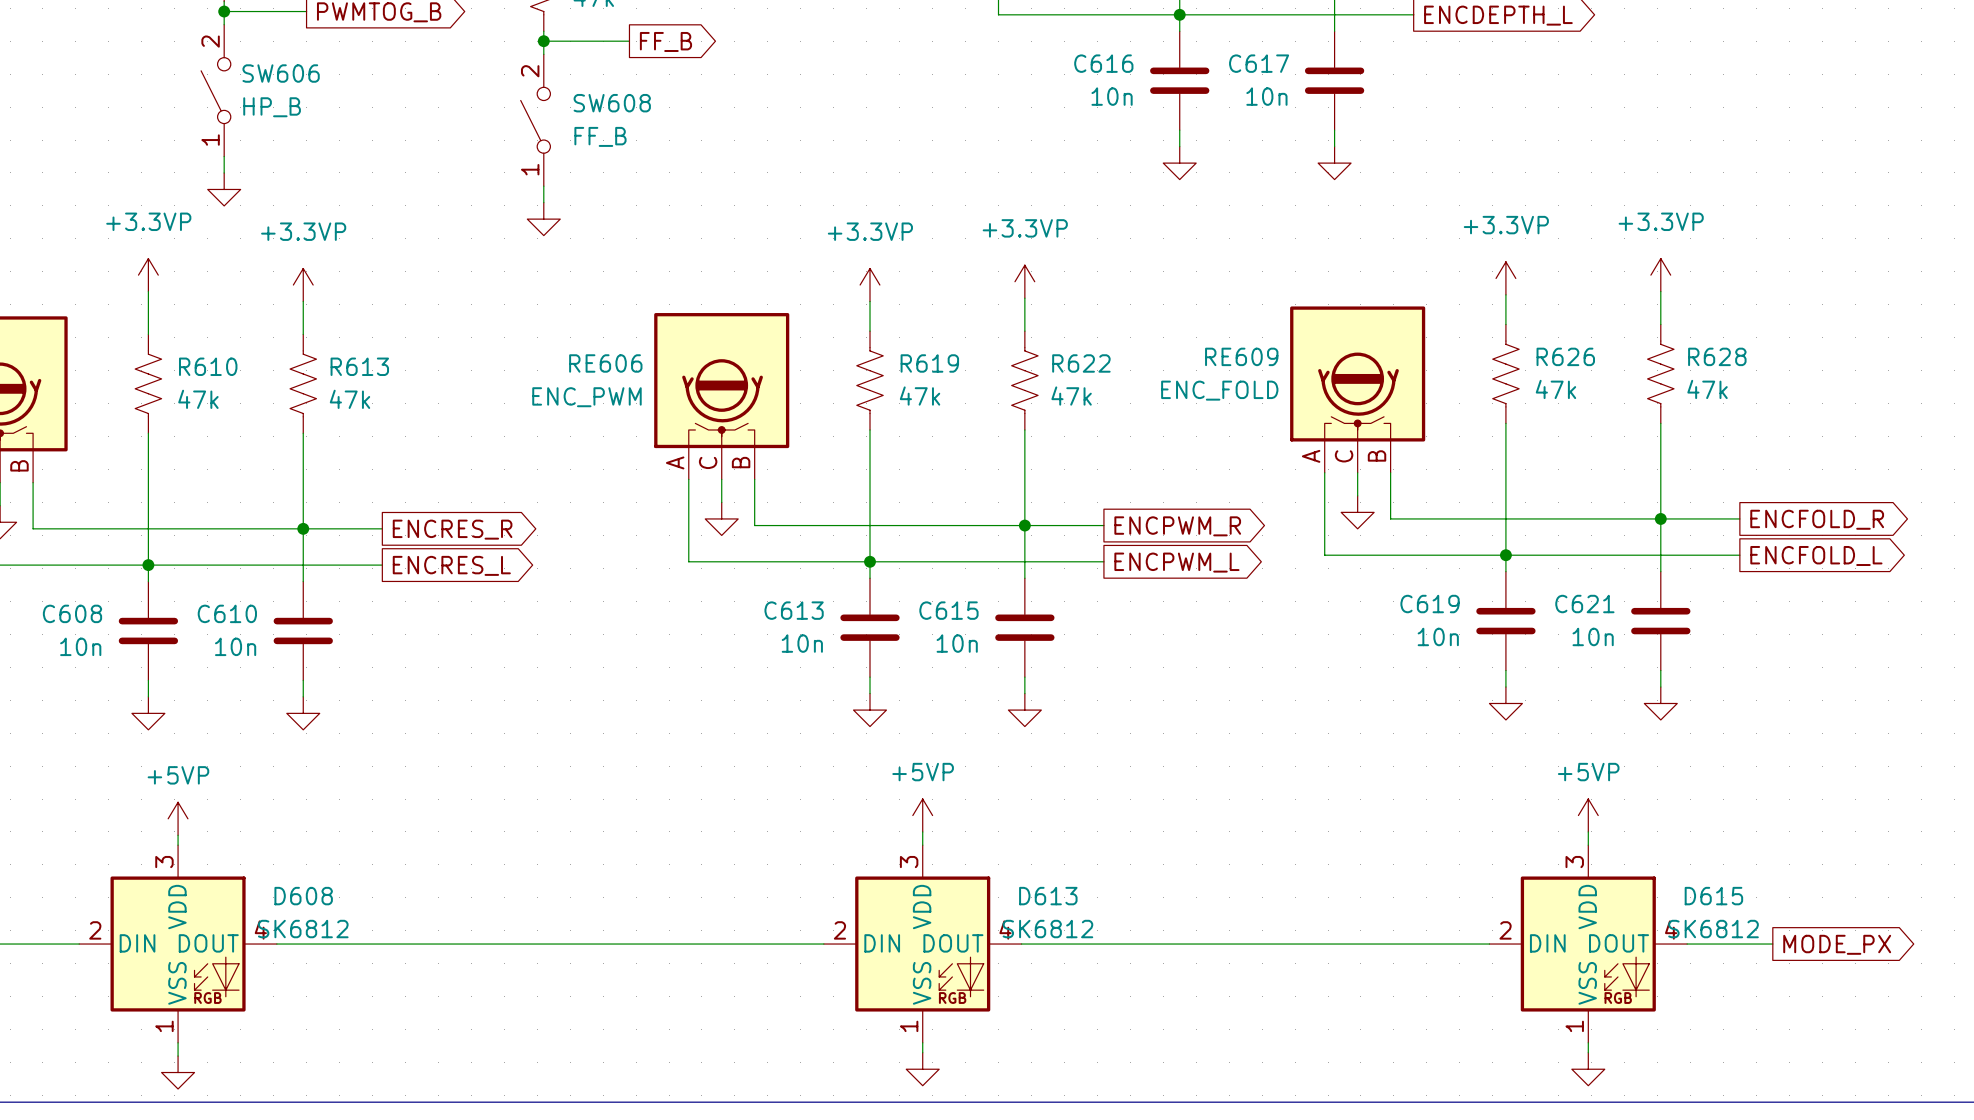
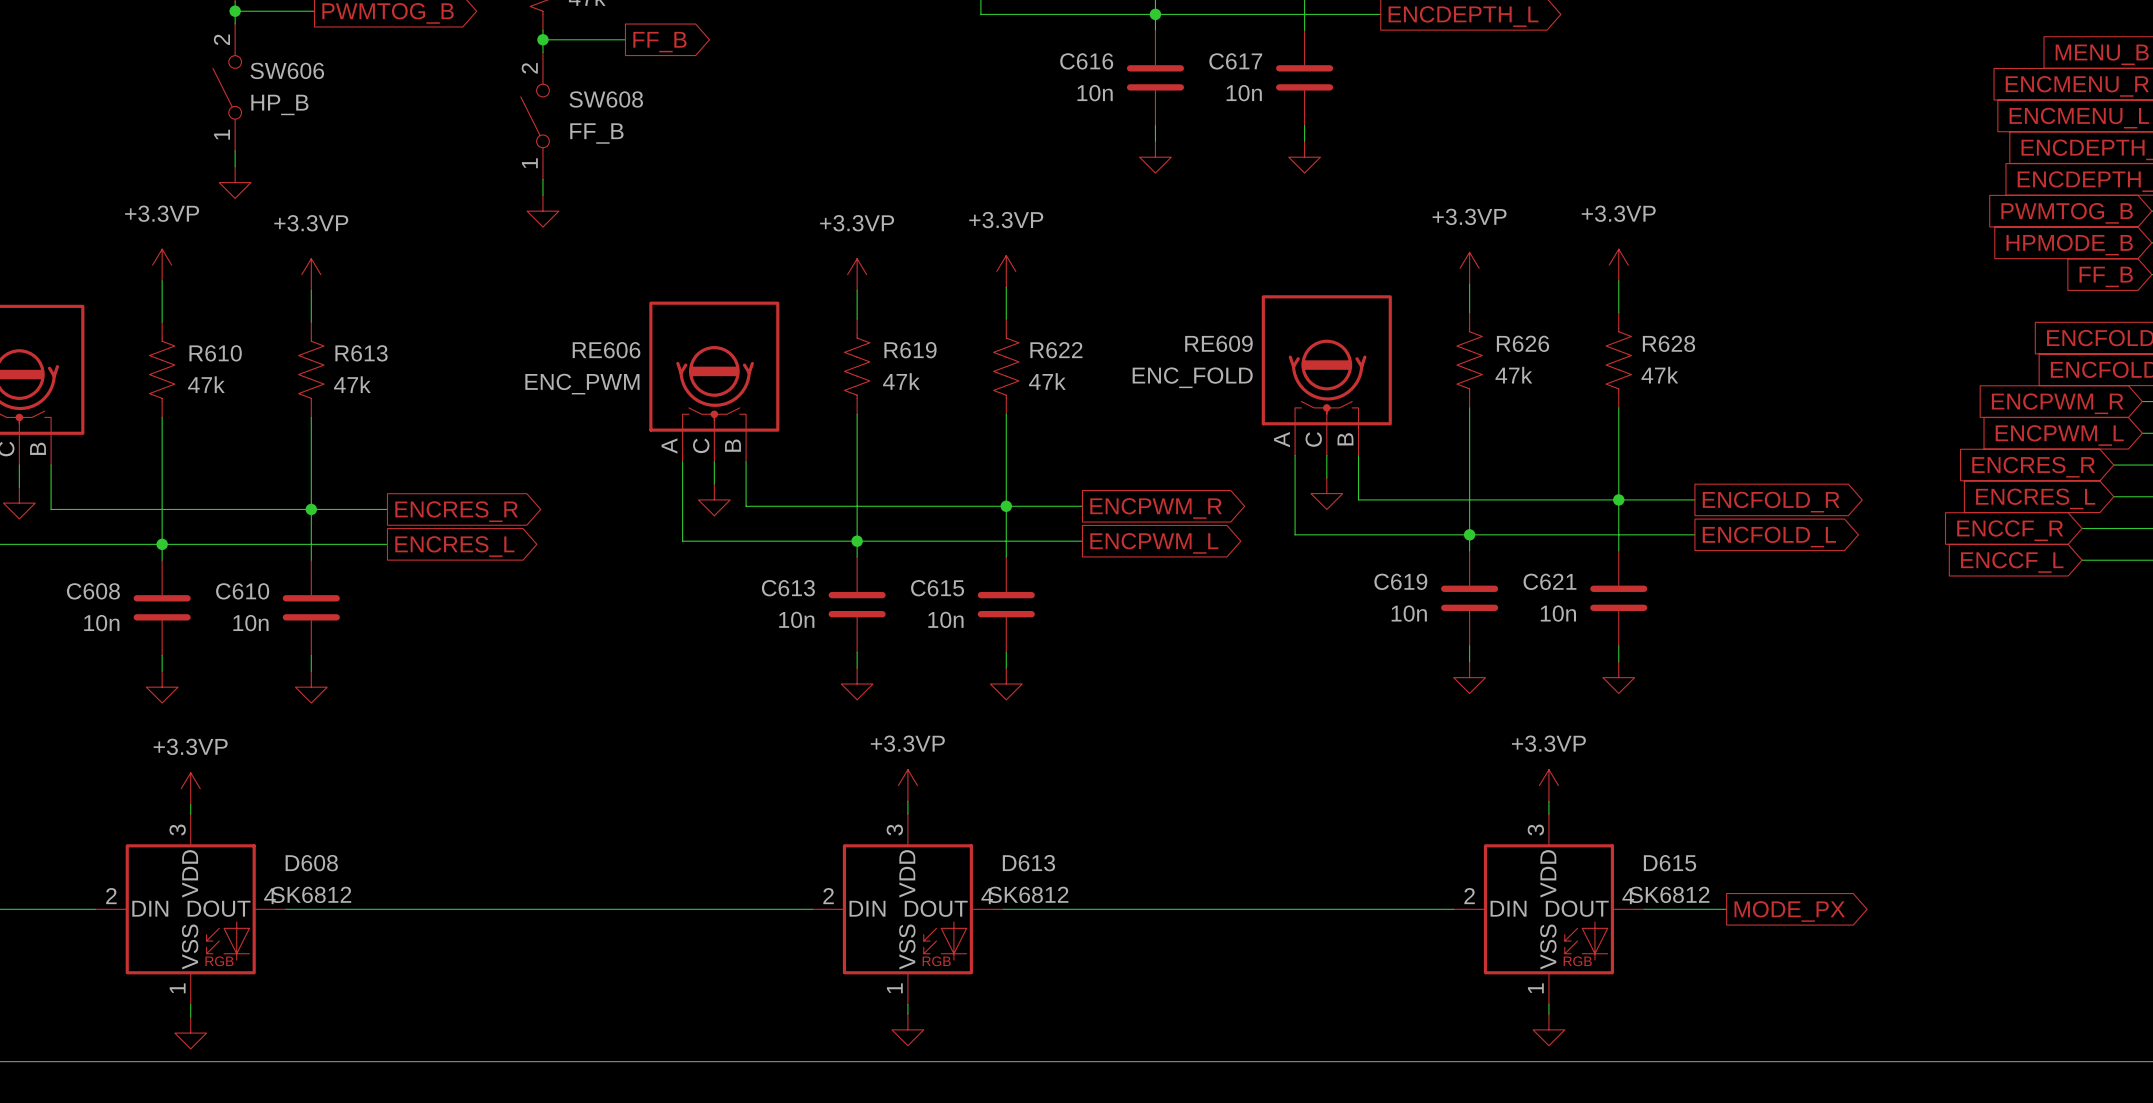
power symbol: +5VP (922, 815) -> +3.3VP (907, 785)
power symbol: +5VP (1588, 815) -> +3.3VP (1548, 785)
power symbol: +5VP (178, 818) -> +3.3VP (190, 788)

